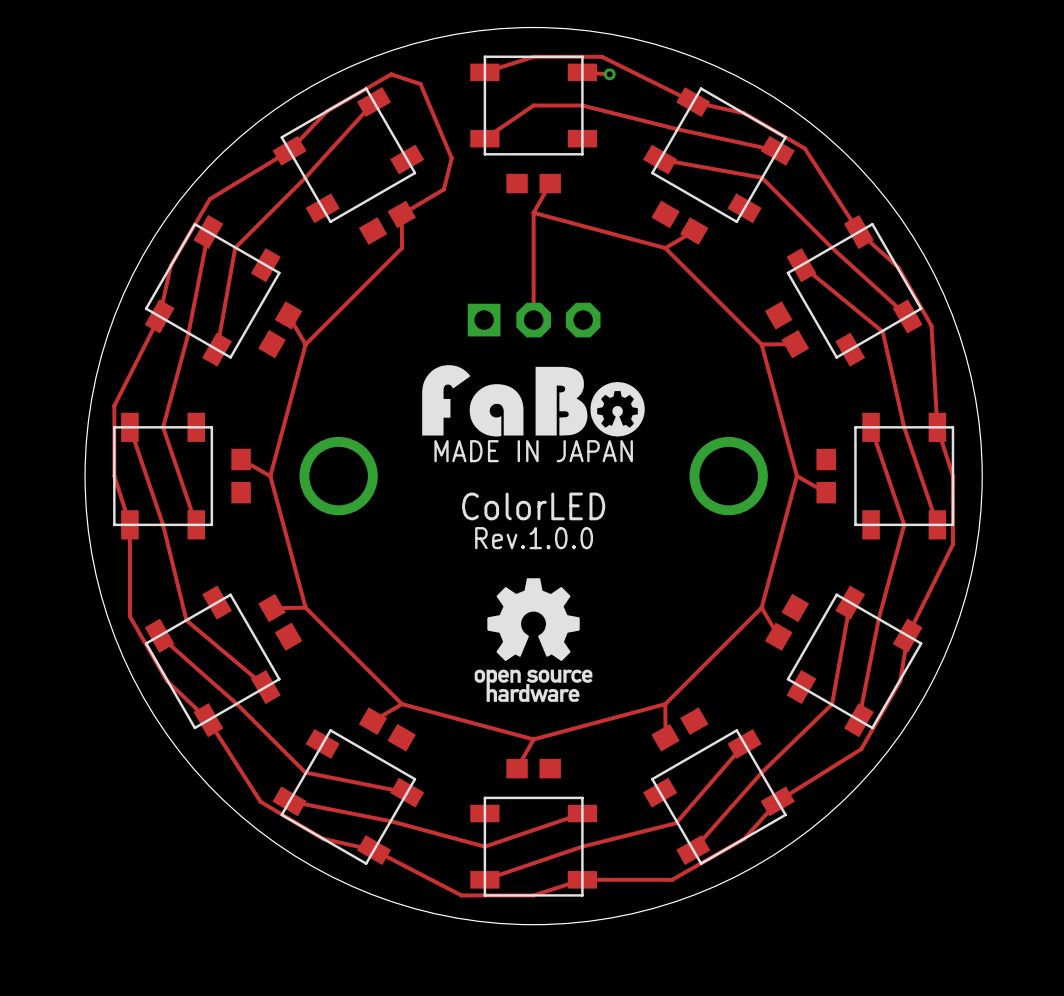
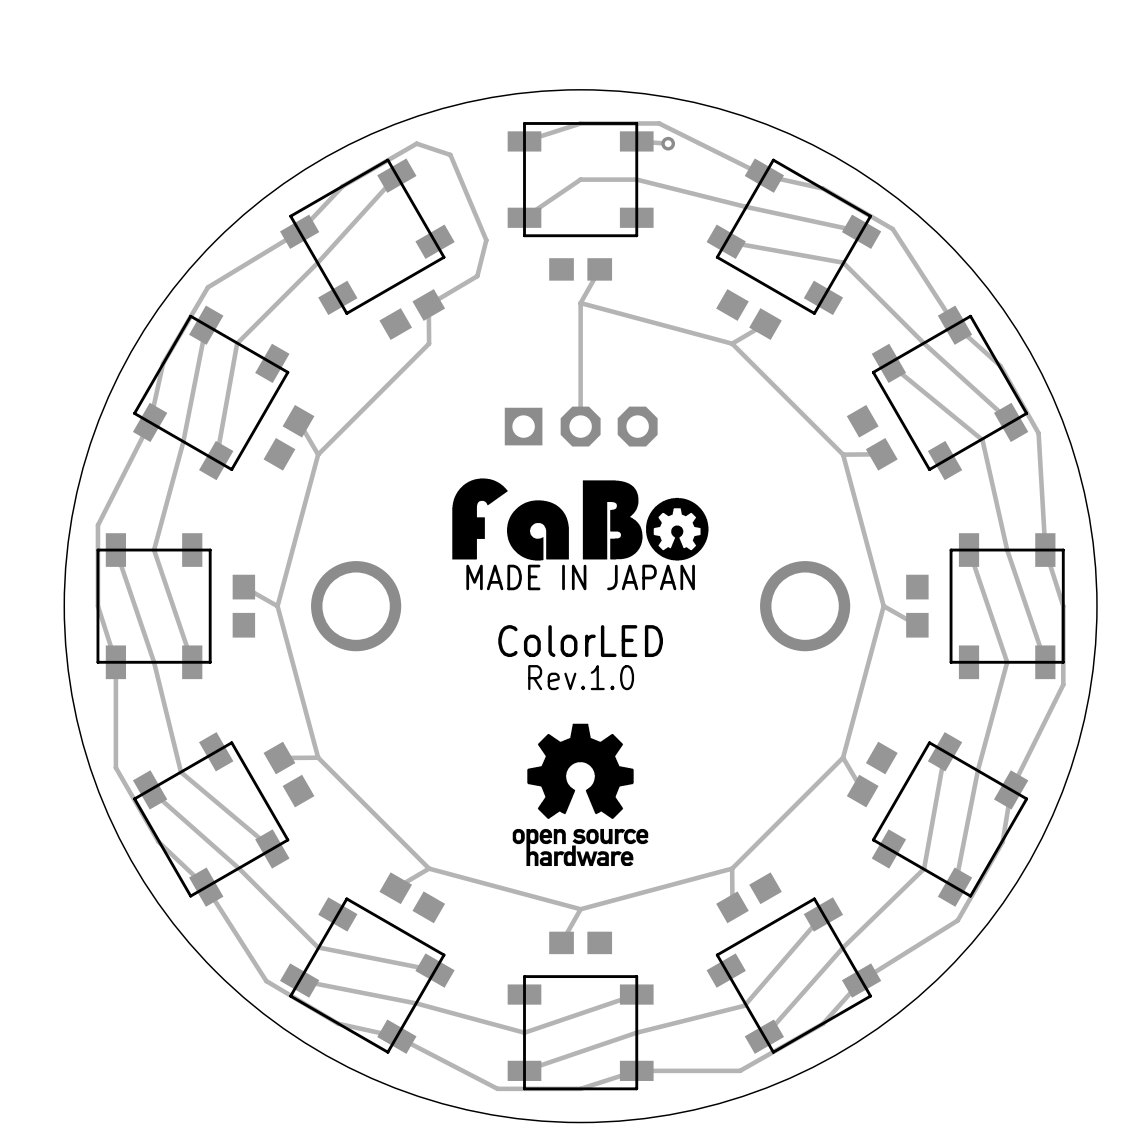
text: Rev.1.0.0 (534, 538) -> Rev.1.0 (581, 677)

